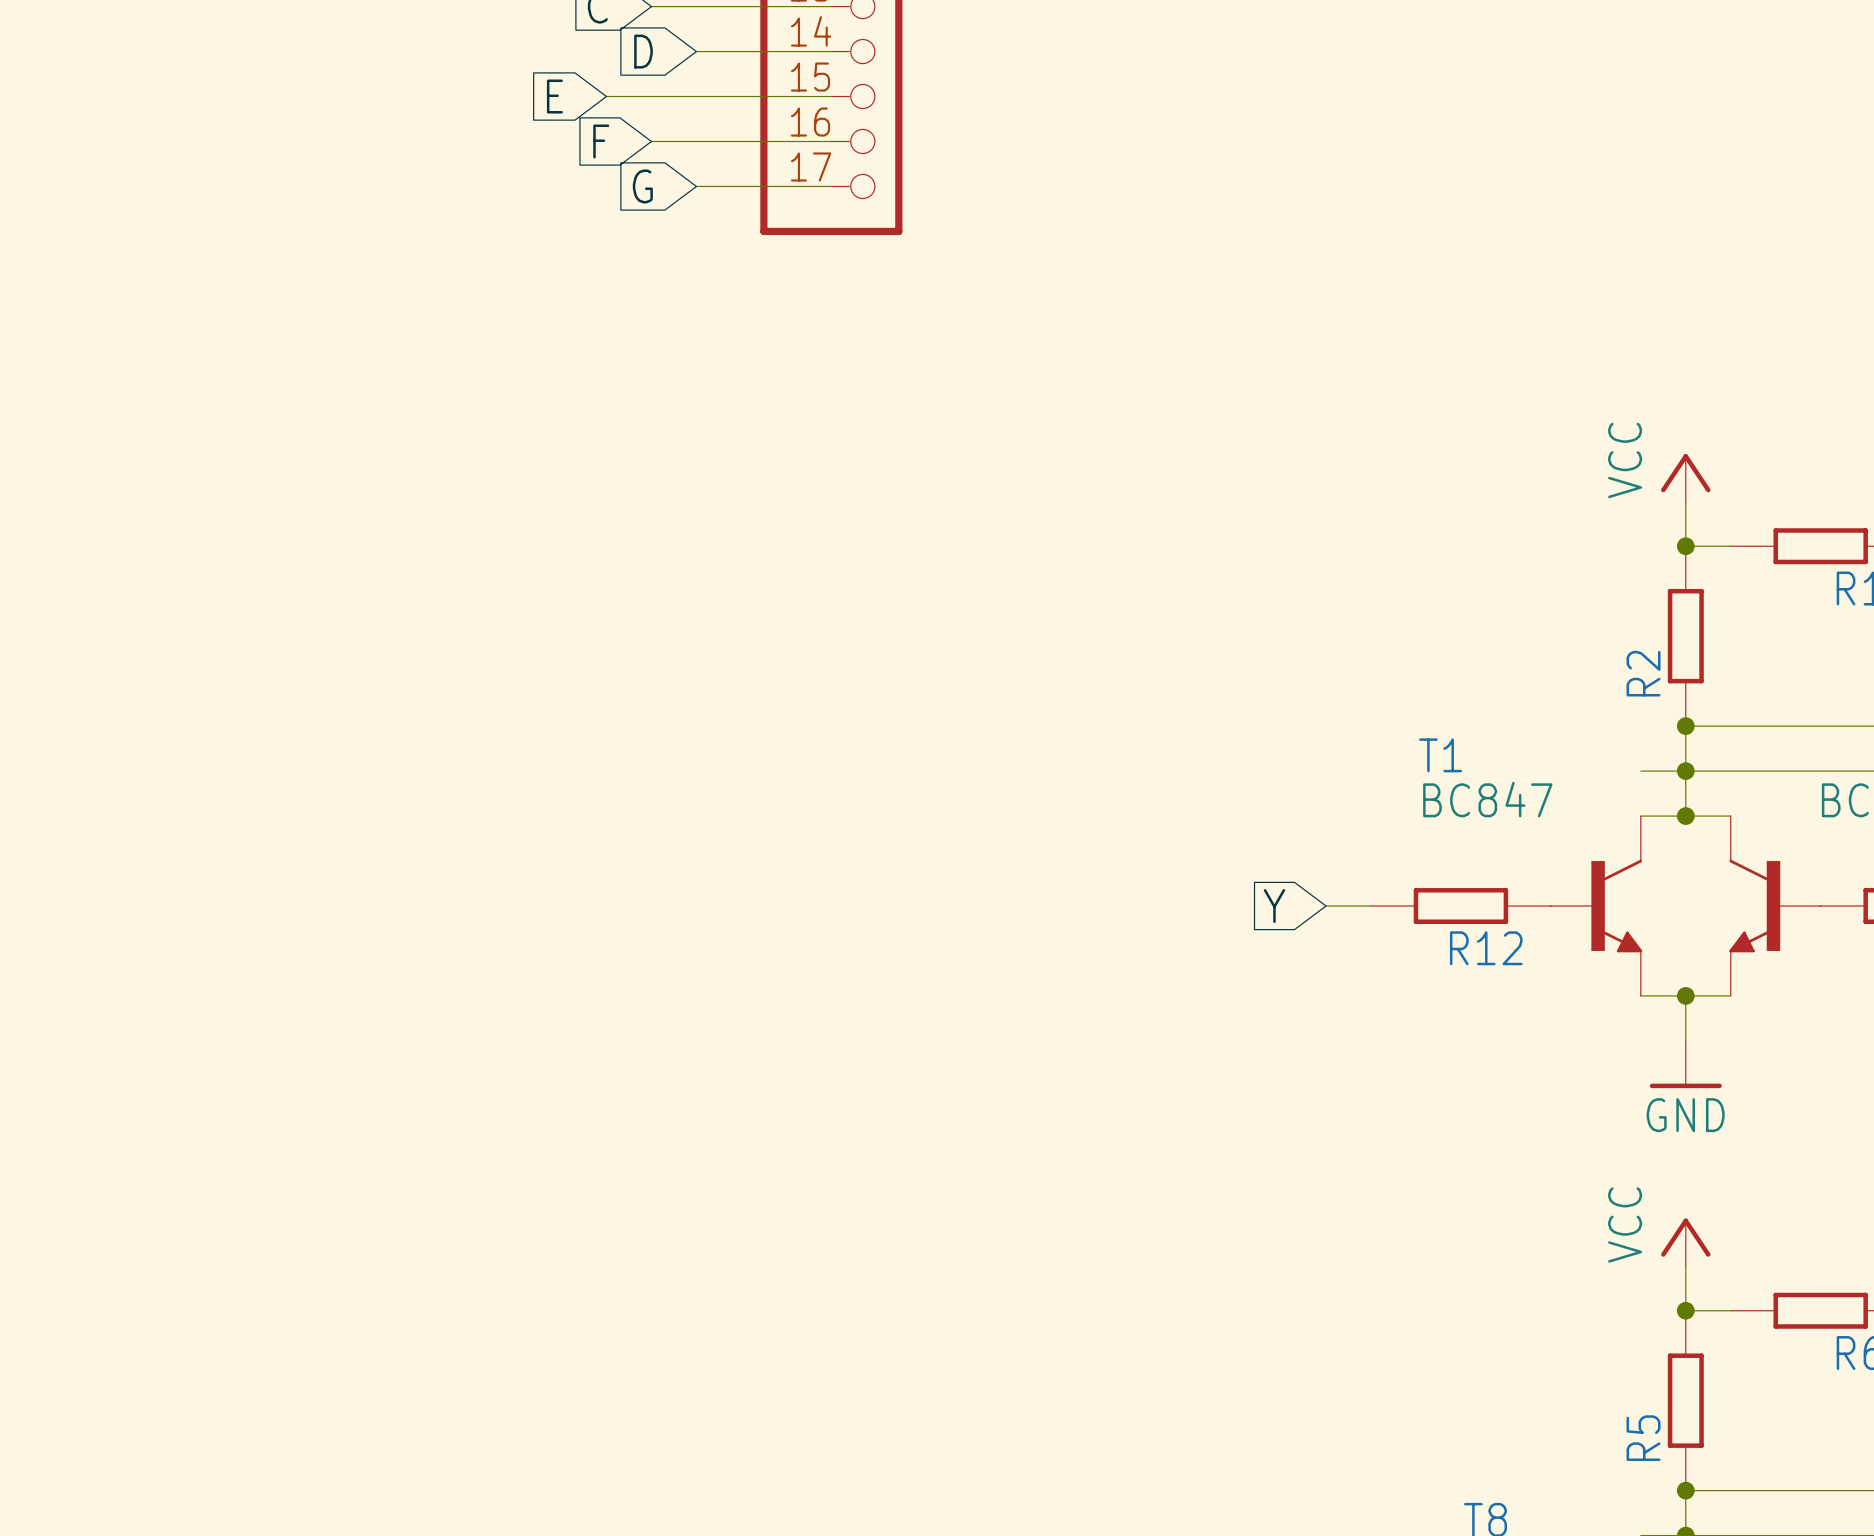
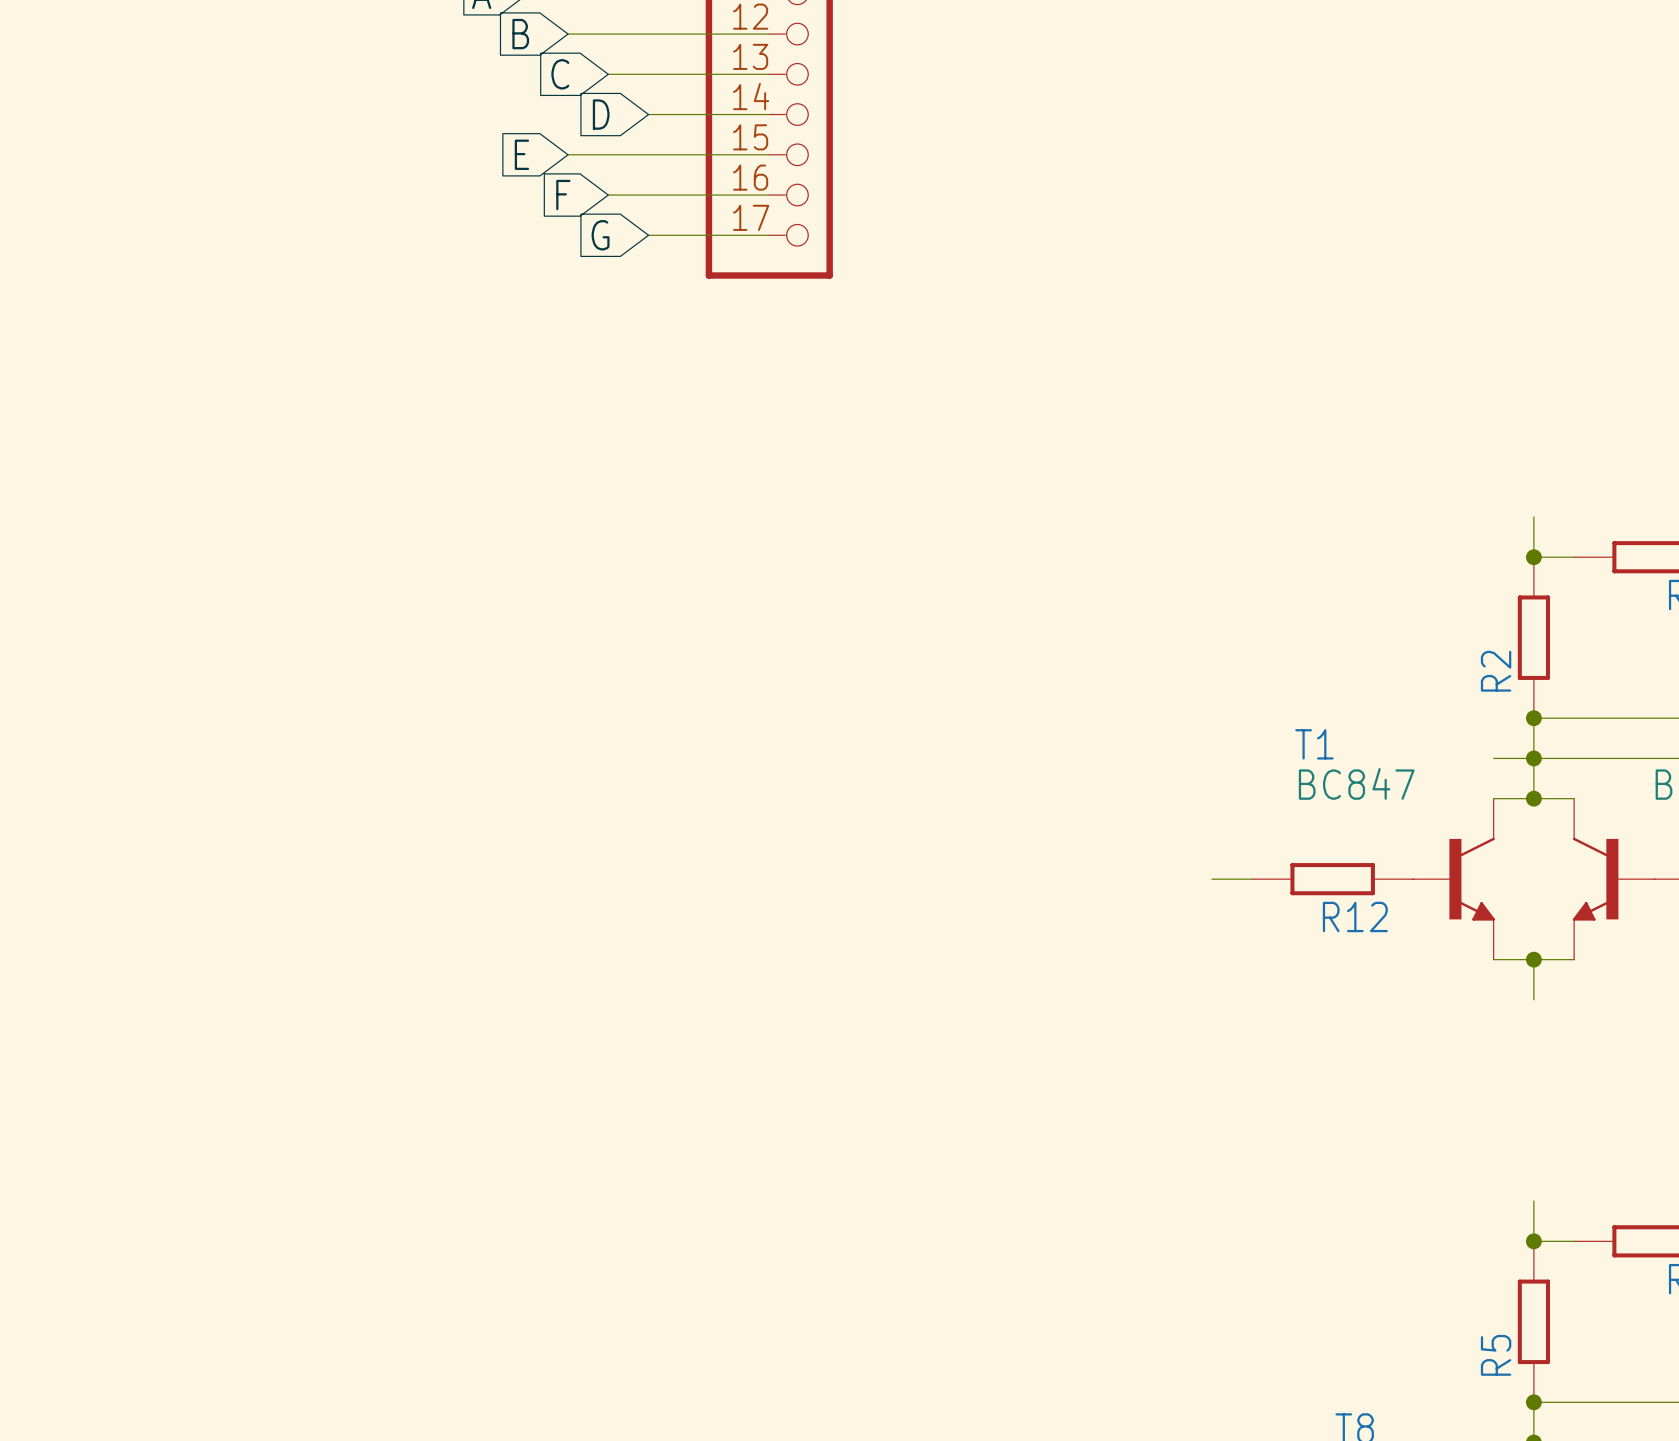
power symbol: VCC (1685, 477) -> none
global label: Y (1274, 906) -> none
power symbol: GND (1685, 1064) -> none
power symbol: VCC (1685, 1242) -> none

